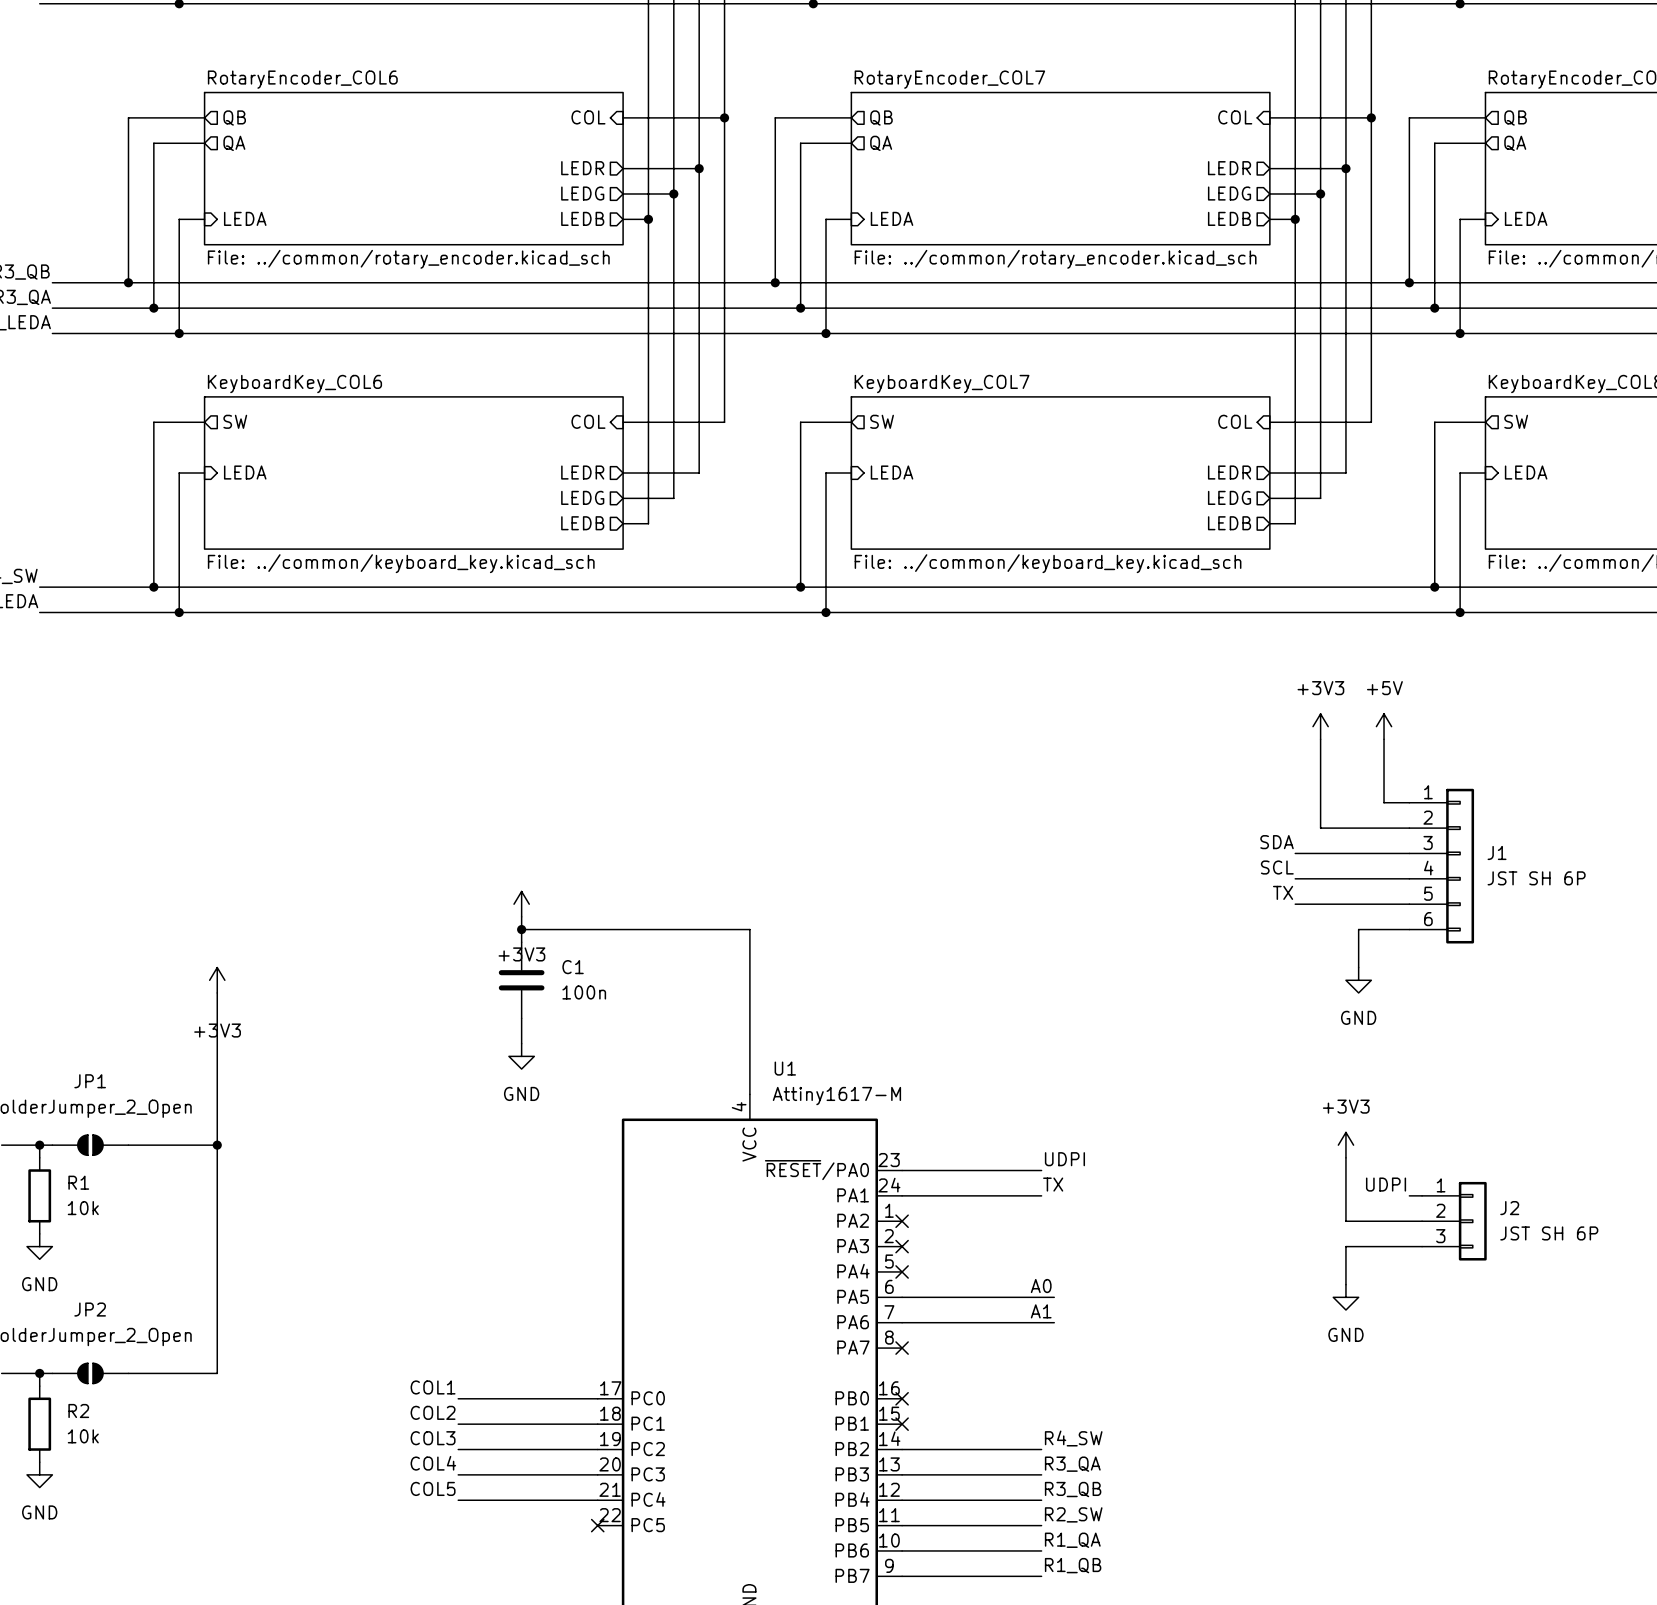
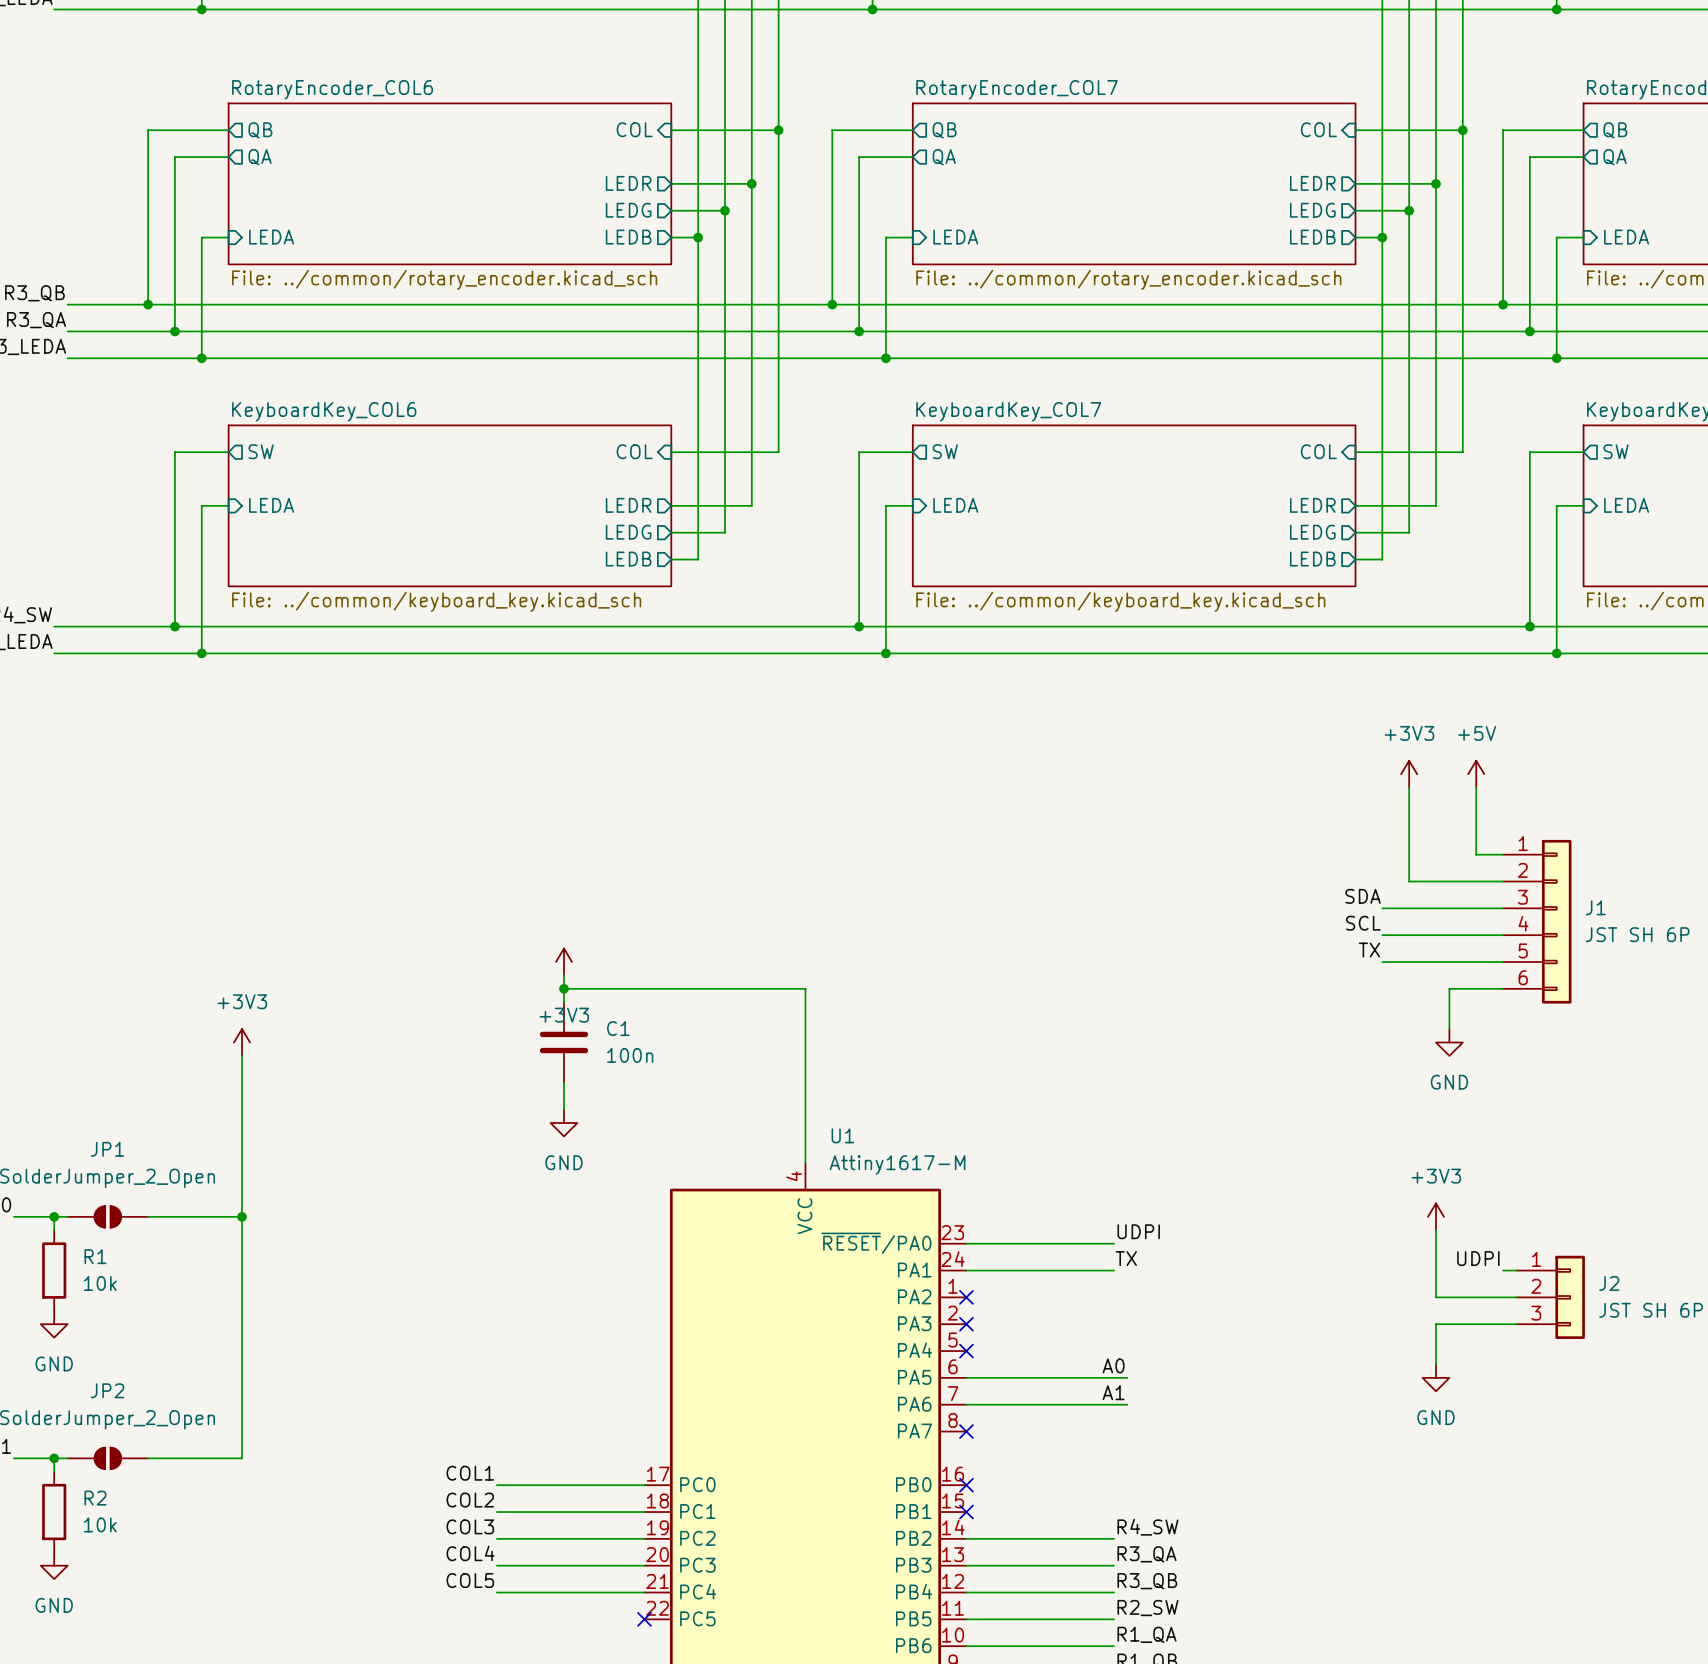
power symbol text position: +3V3 (217, 1030) -> +3V3 (242, 1001)

